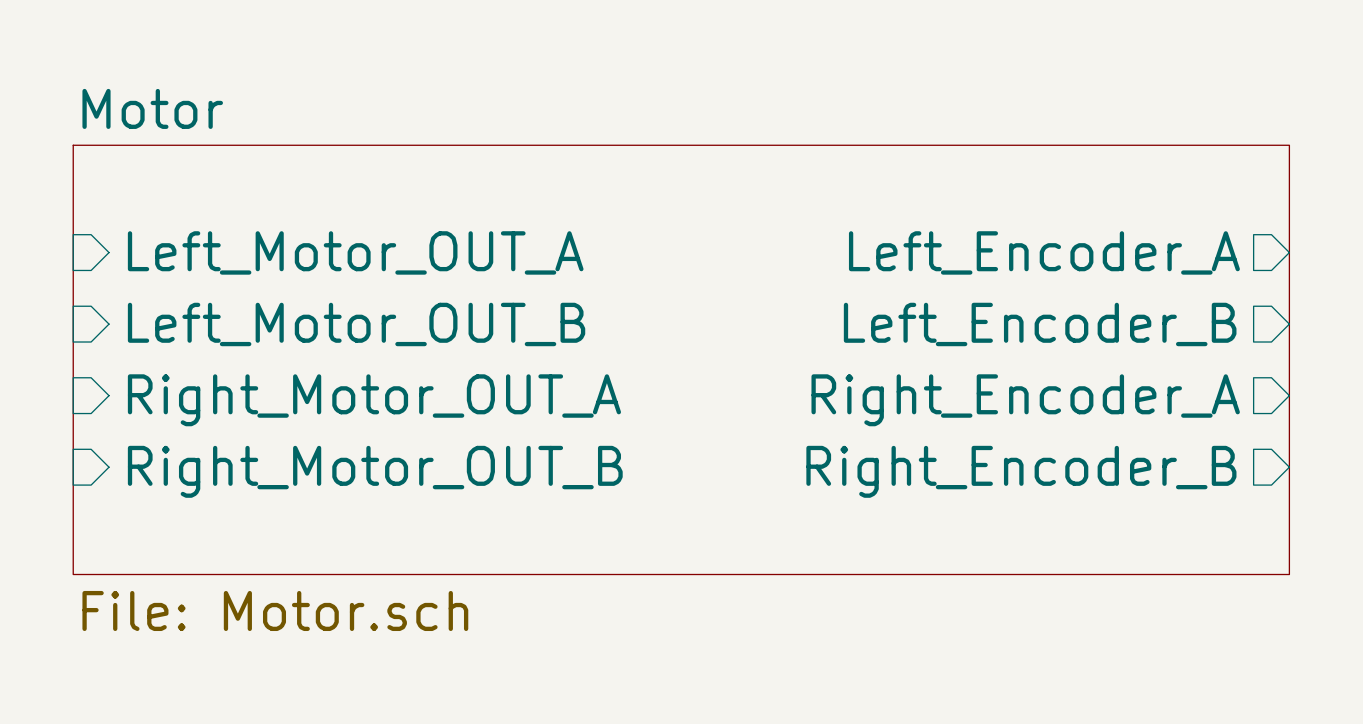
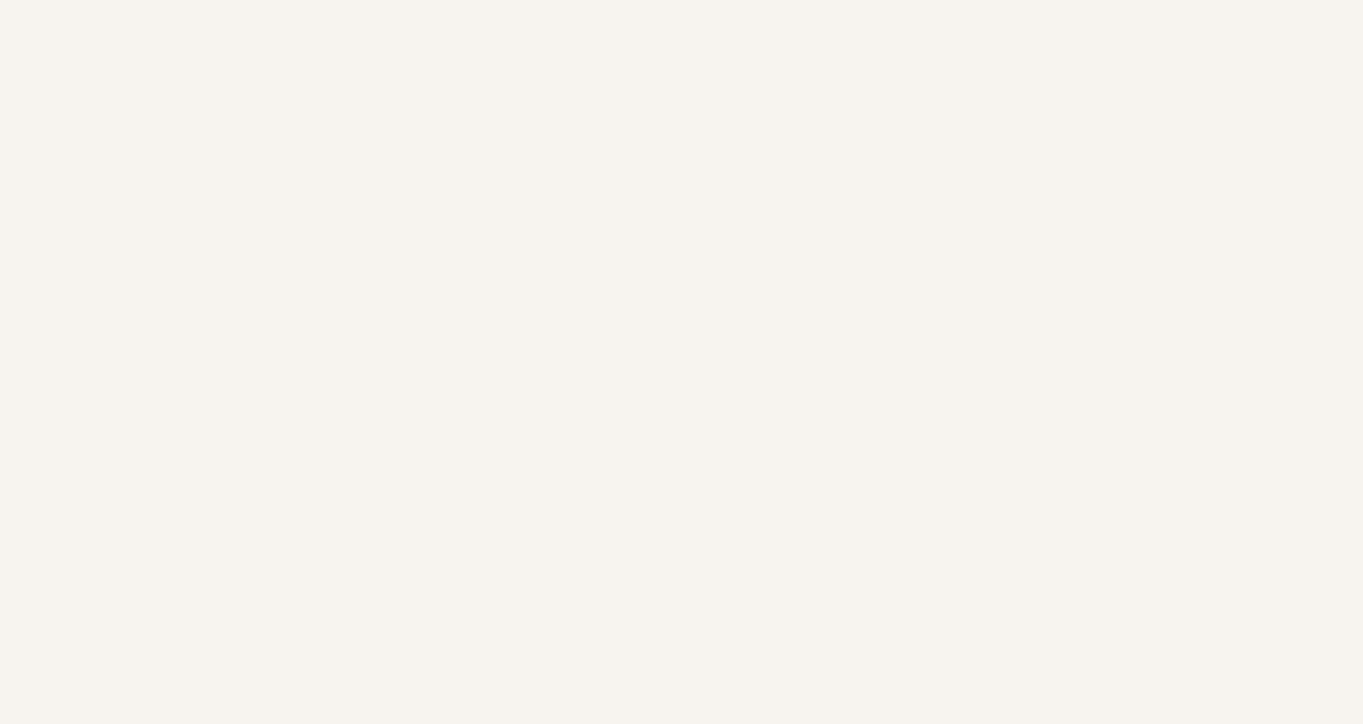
sheet pin: Left_Motor_OUT_A (355, 252) -> none
sheet pin: Left_Encoder_A (1044, 252) -> none
sheet pin: Left_Motor_OUT_B (356, 324) -> none
sheet pin: Left_Encoder_B (1040, 324) -> none
sheet Motor: File: Motor.sch (681, 359) -> none
sheet pin: Right_Motor_OUT_A (374, 400) -> none
sheet pin: Right_Encoder_A (1025, 400) -> none
sheet pin: Right_Motor_OUT_B (375, 471) -> none
sheet pin: Right_Encoder_B (1021, 471) -> none

